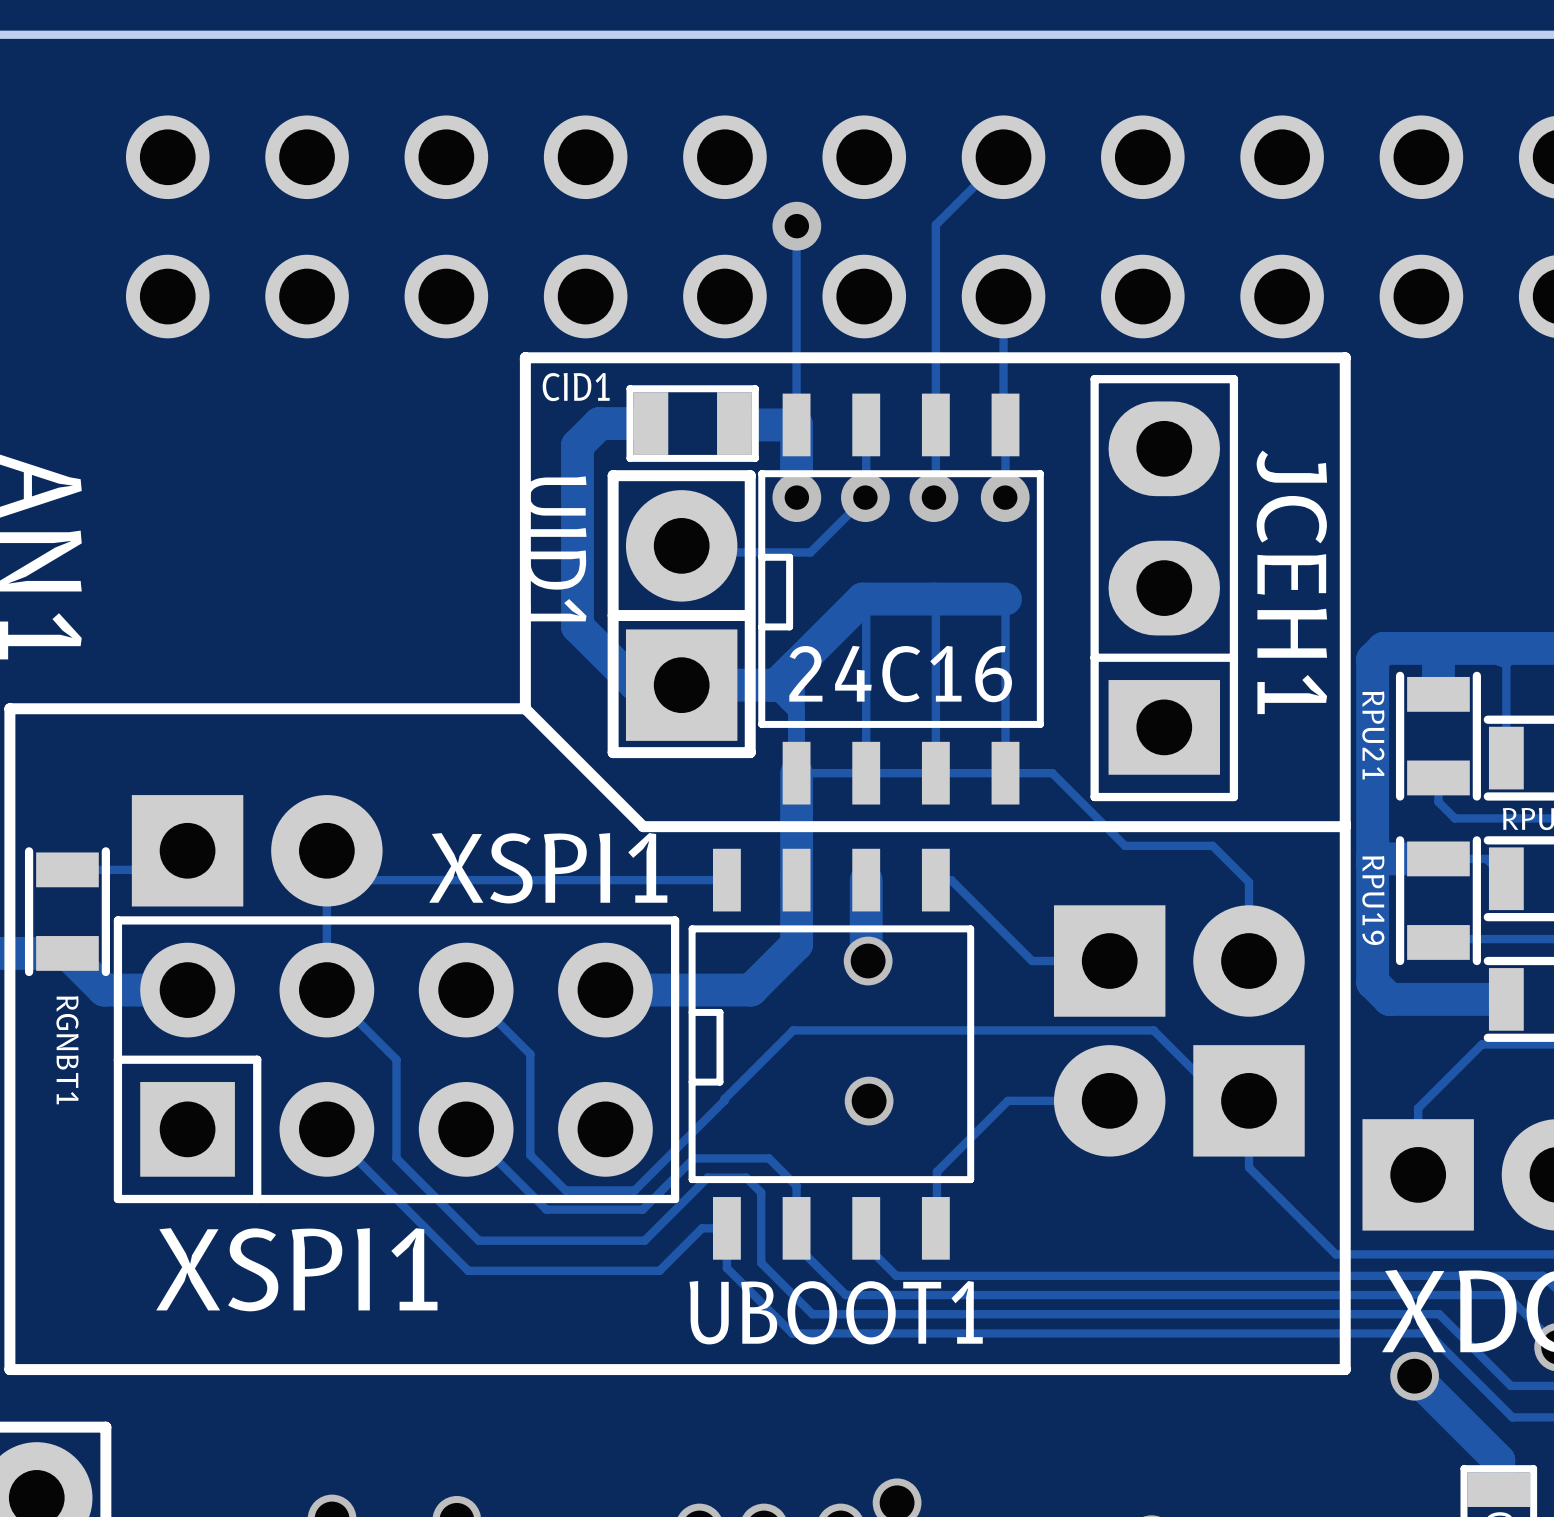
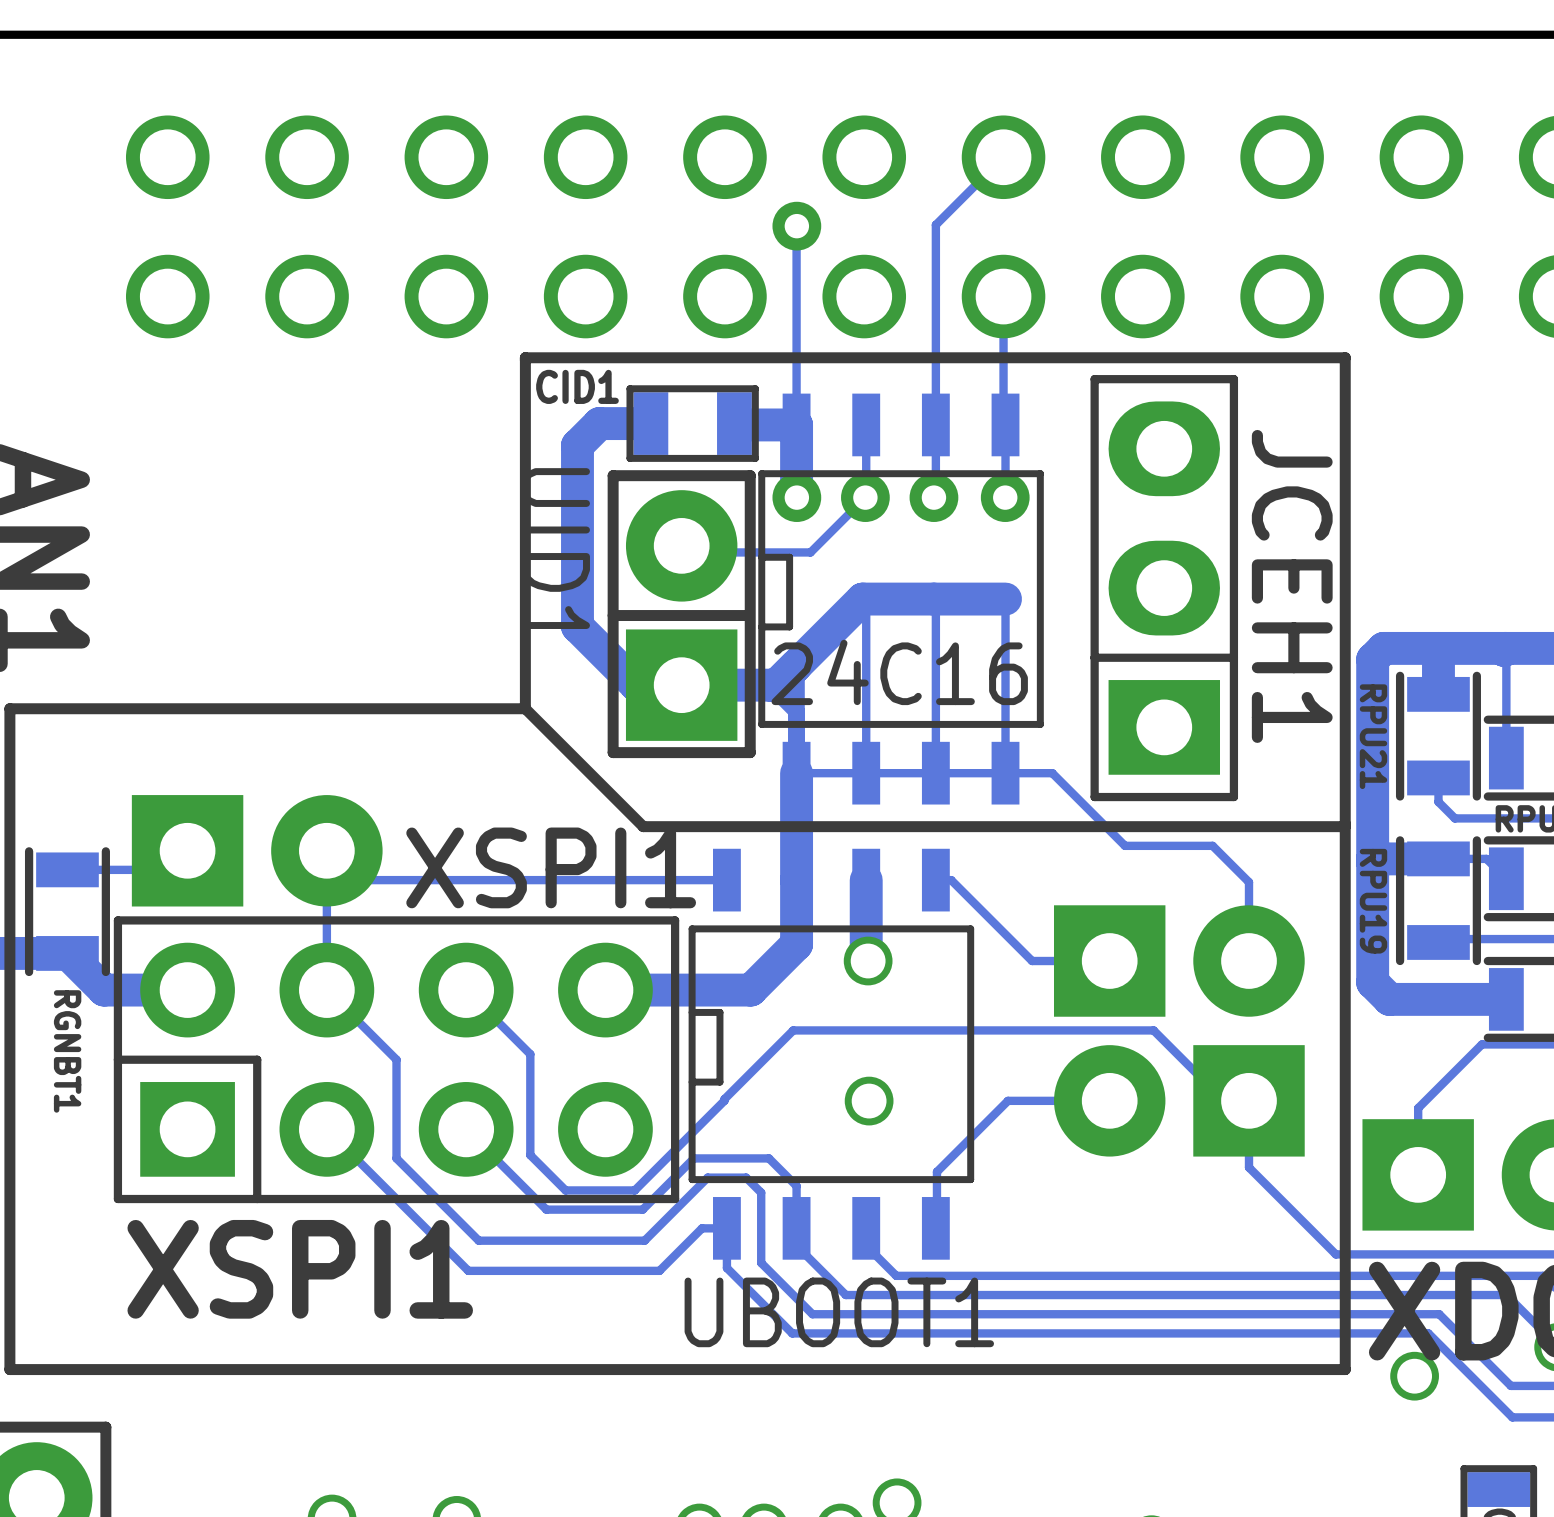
track: (1414, 1376) (1498, 1460) (1498, 1489) -> none

